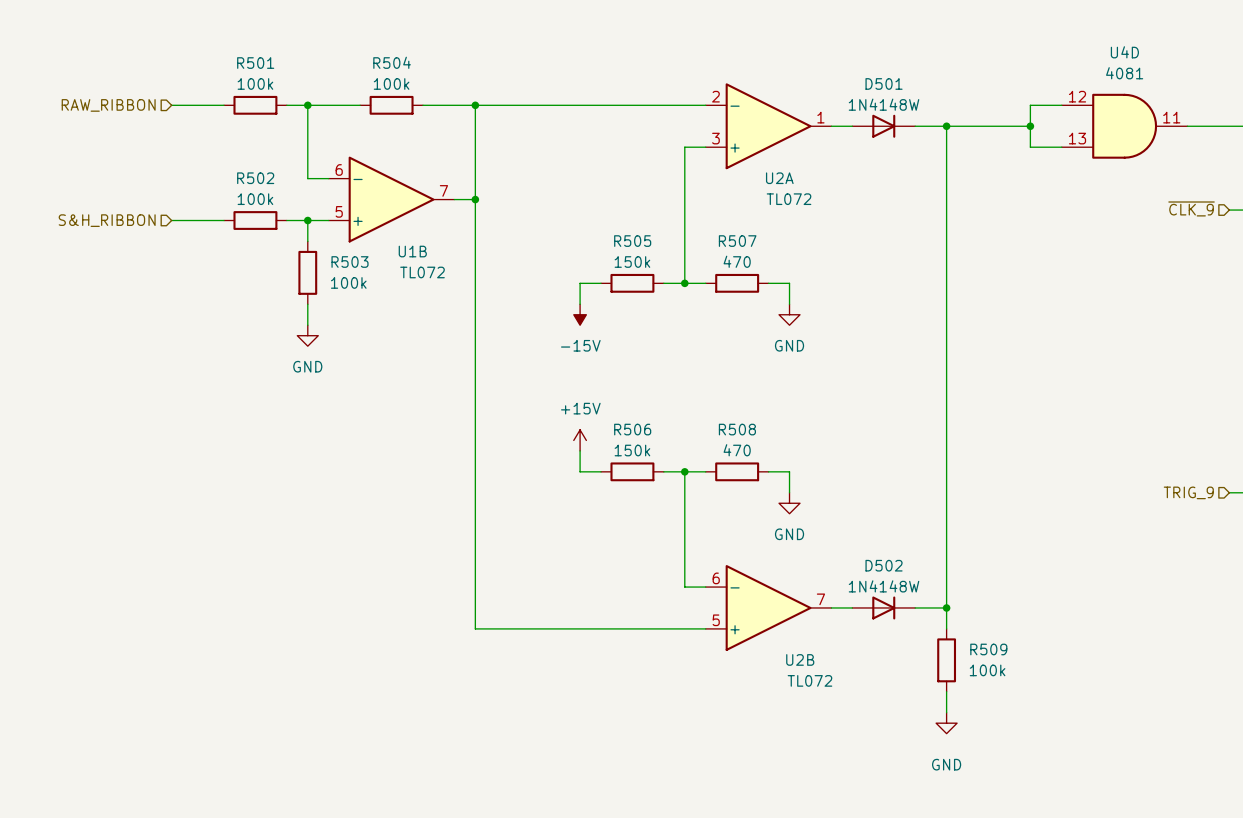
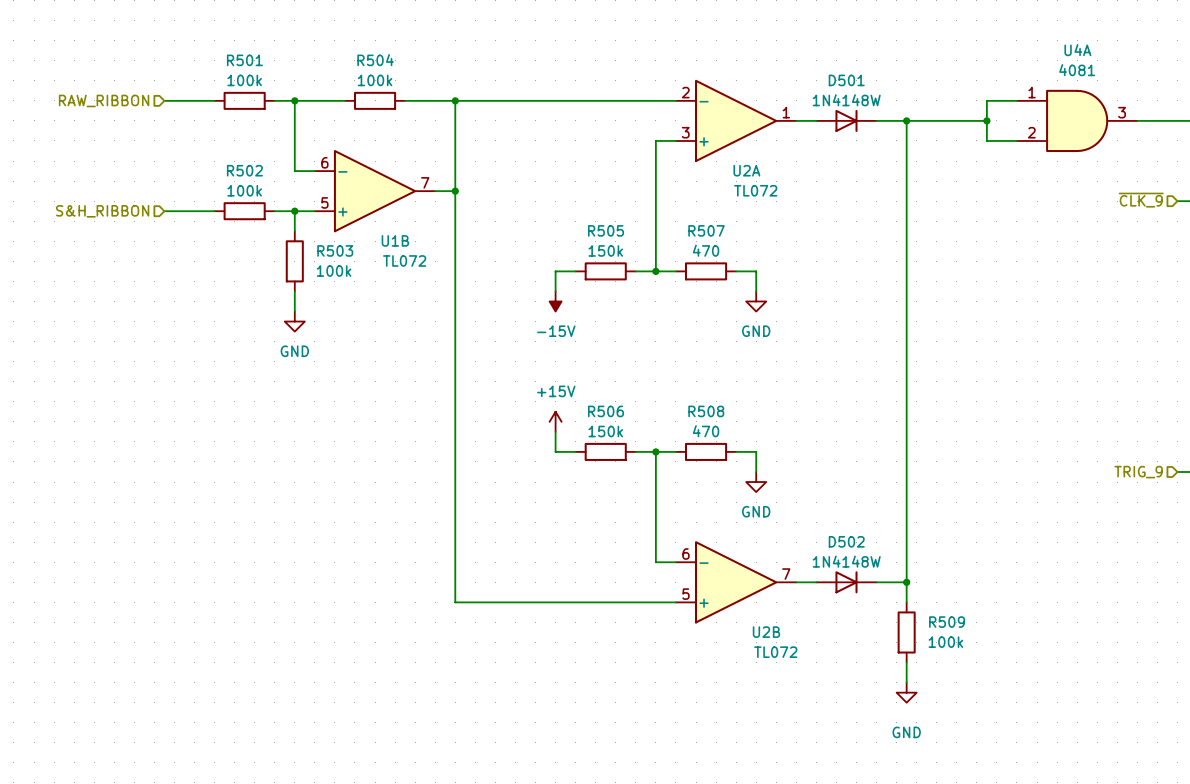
U4D name: U4D (1124, 52) -> U4A (1077, 50)
U4D pin number: 12 (1077, 96) -> 1 (1032, 92)
U4D pin number: 11 (1171, 117) -> 3 (1122, 112)
U4D pin number: 13 (1077, 138) -> 2 (1031, 132)

